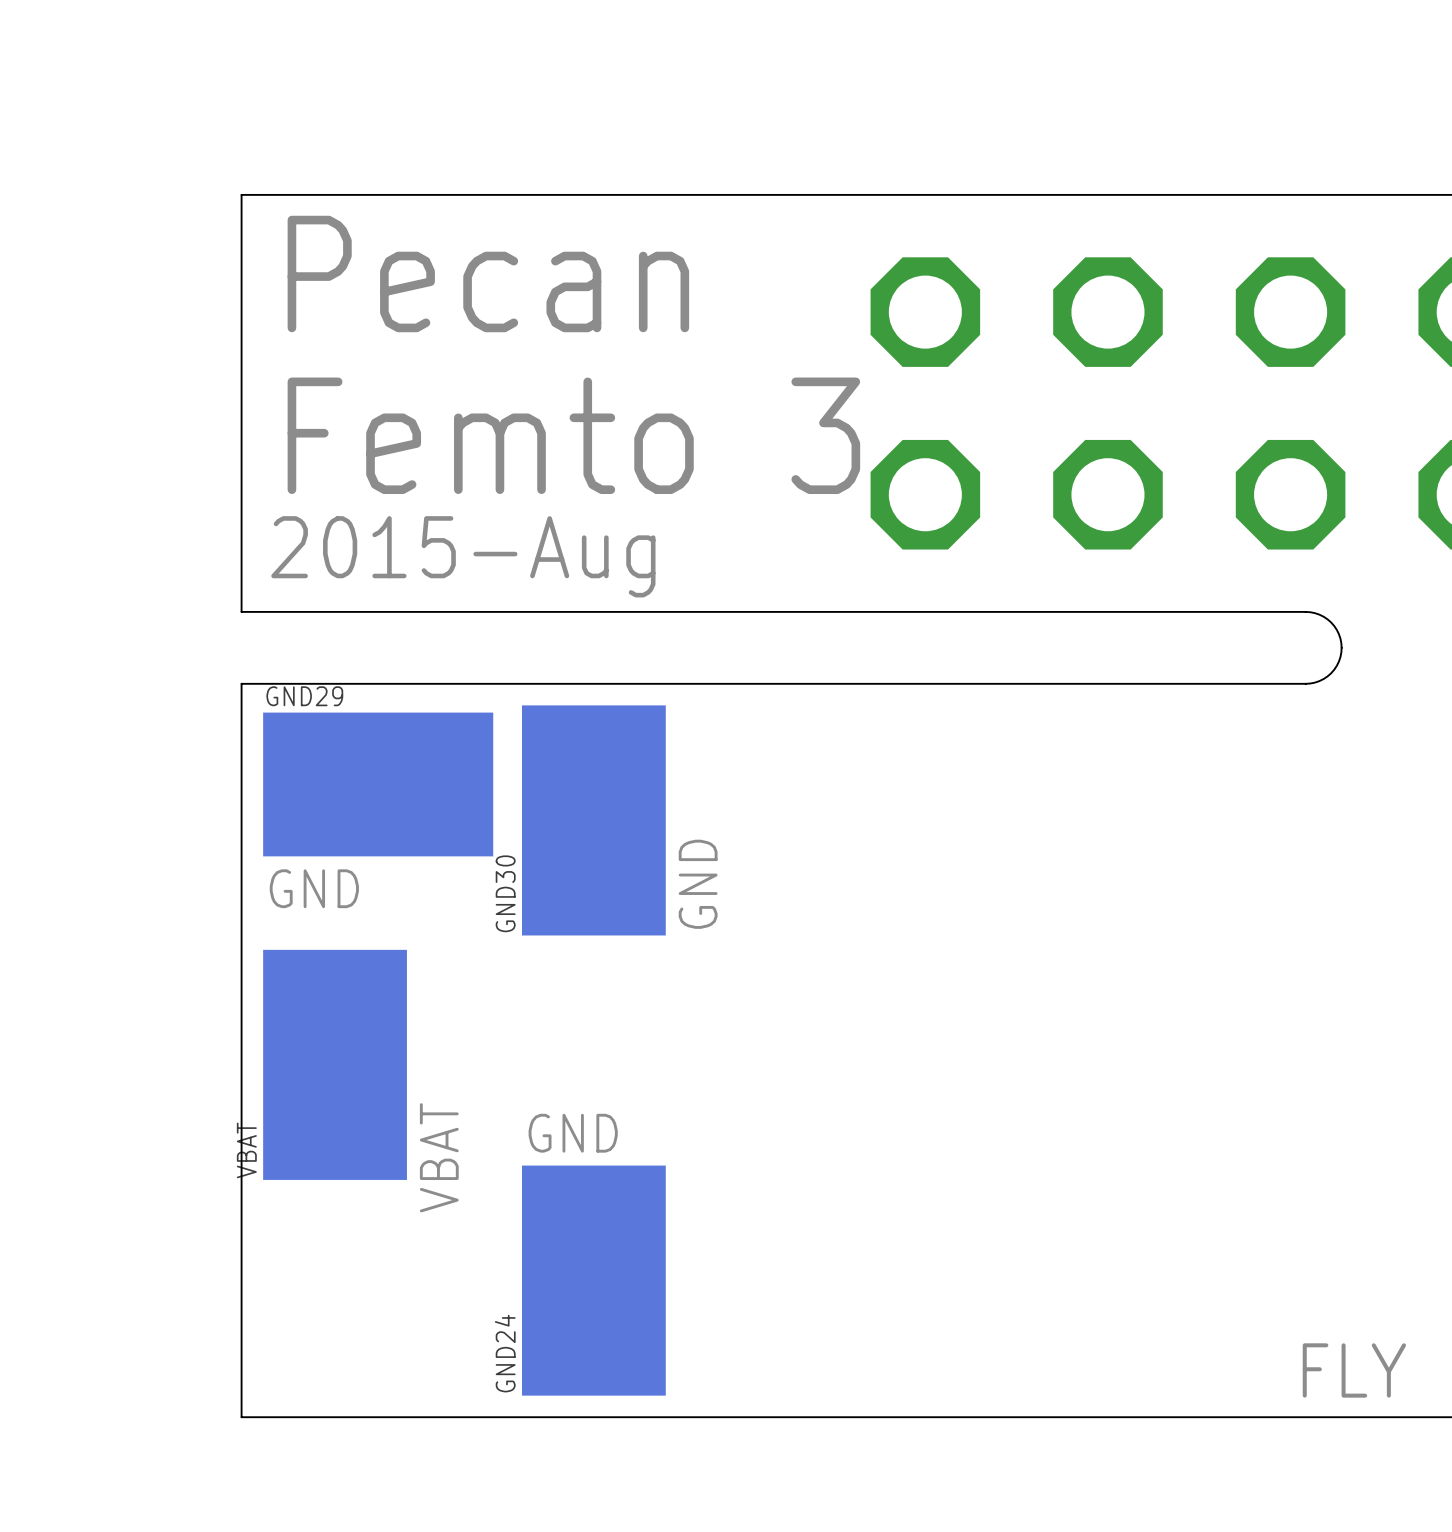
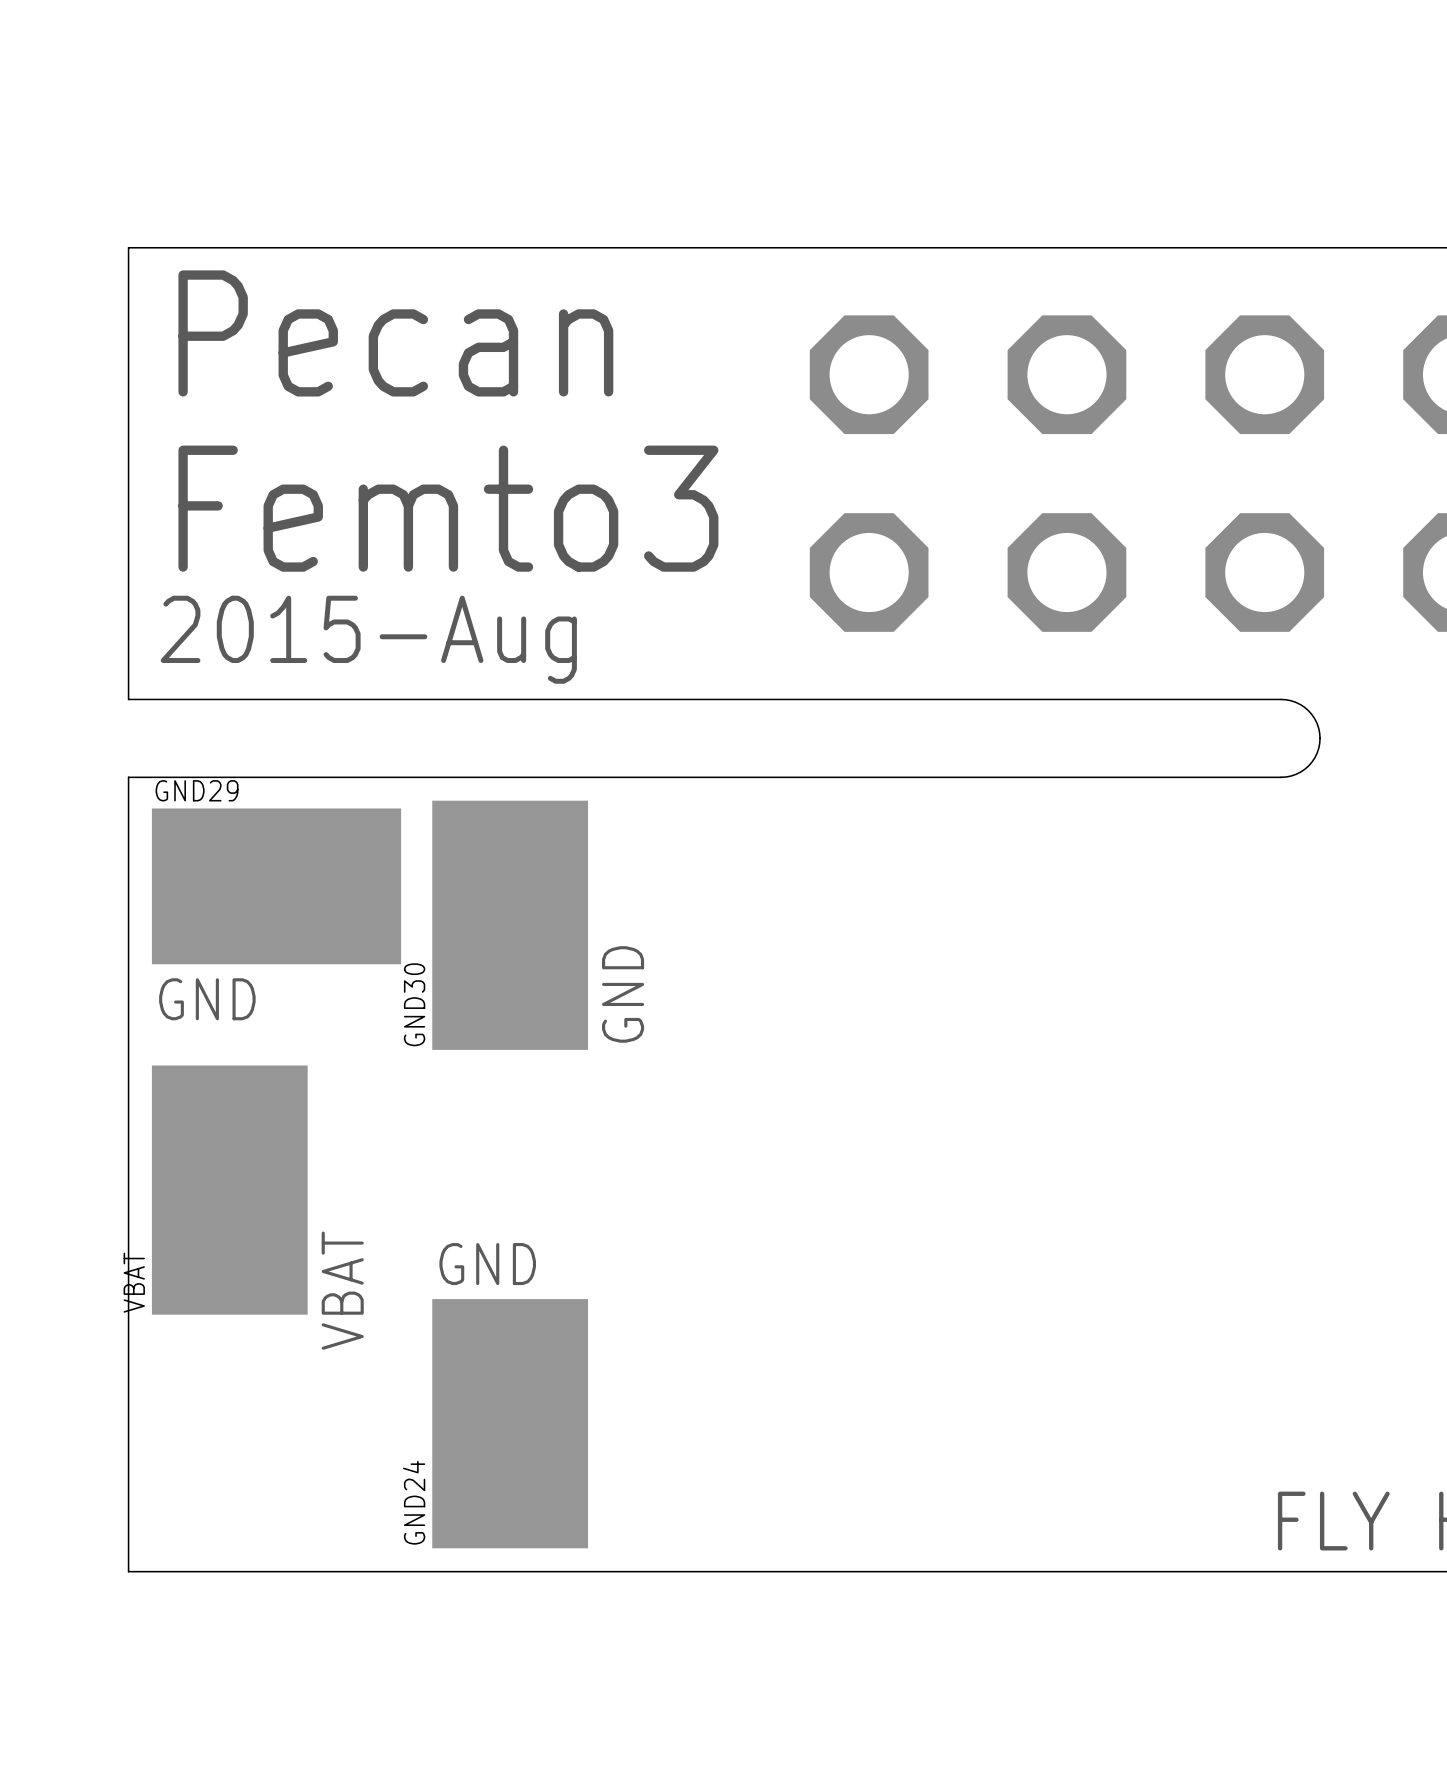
text: Femto 3 (573, 435) -> Femto3 (448, 508)

